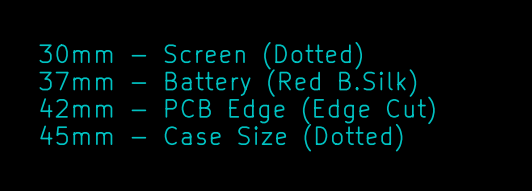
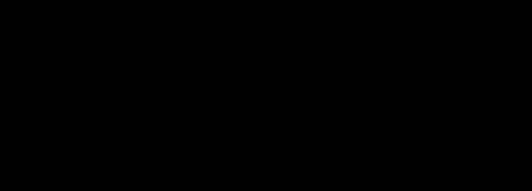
text: 30mm - Screen (Dotted) (200, 55) -> none
text: 37mm - Battery (Red B.Silk) (227, 83) -> none
text: 42mm - PCB Edge (Edge Cut) (237, 110) -> none
text: 45mm - Case Size (Dotted) (221, 137) -> none

